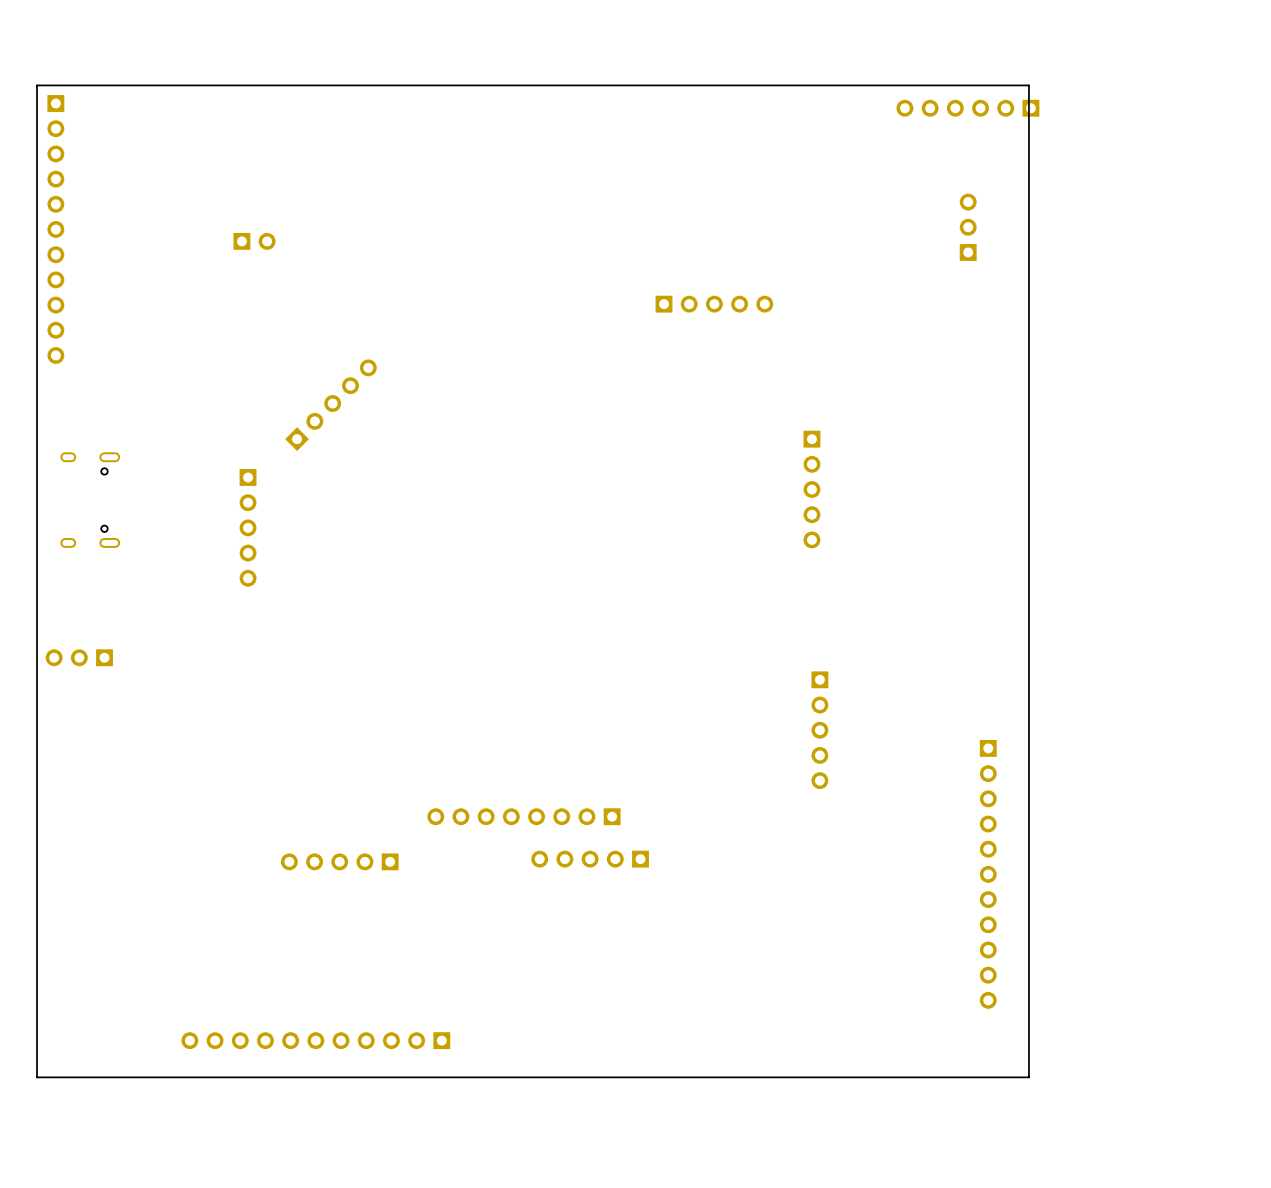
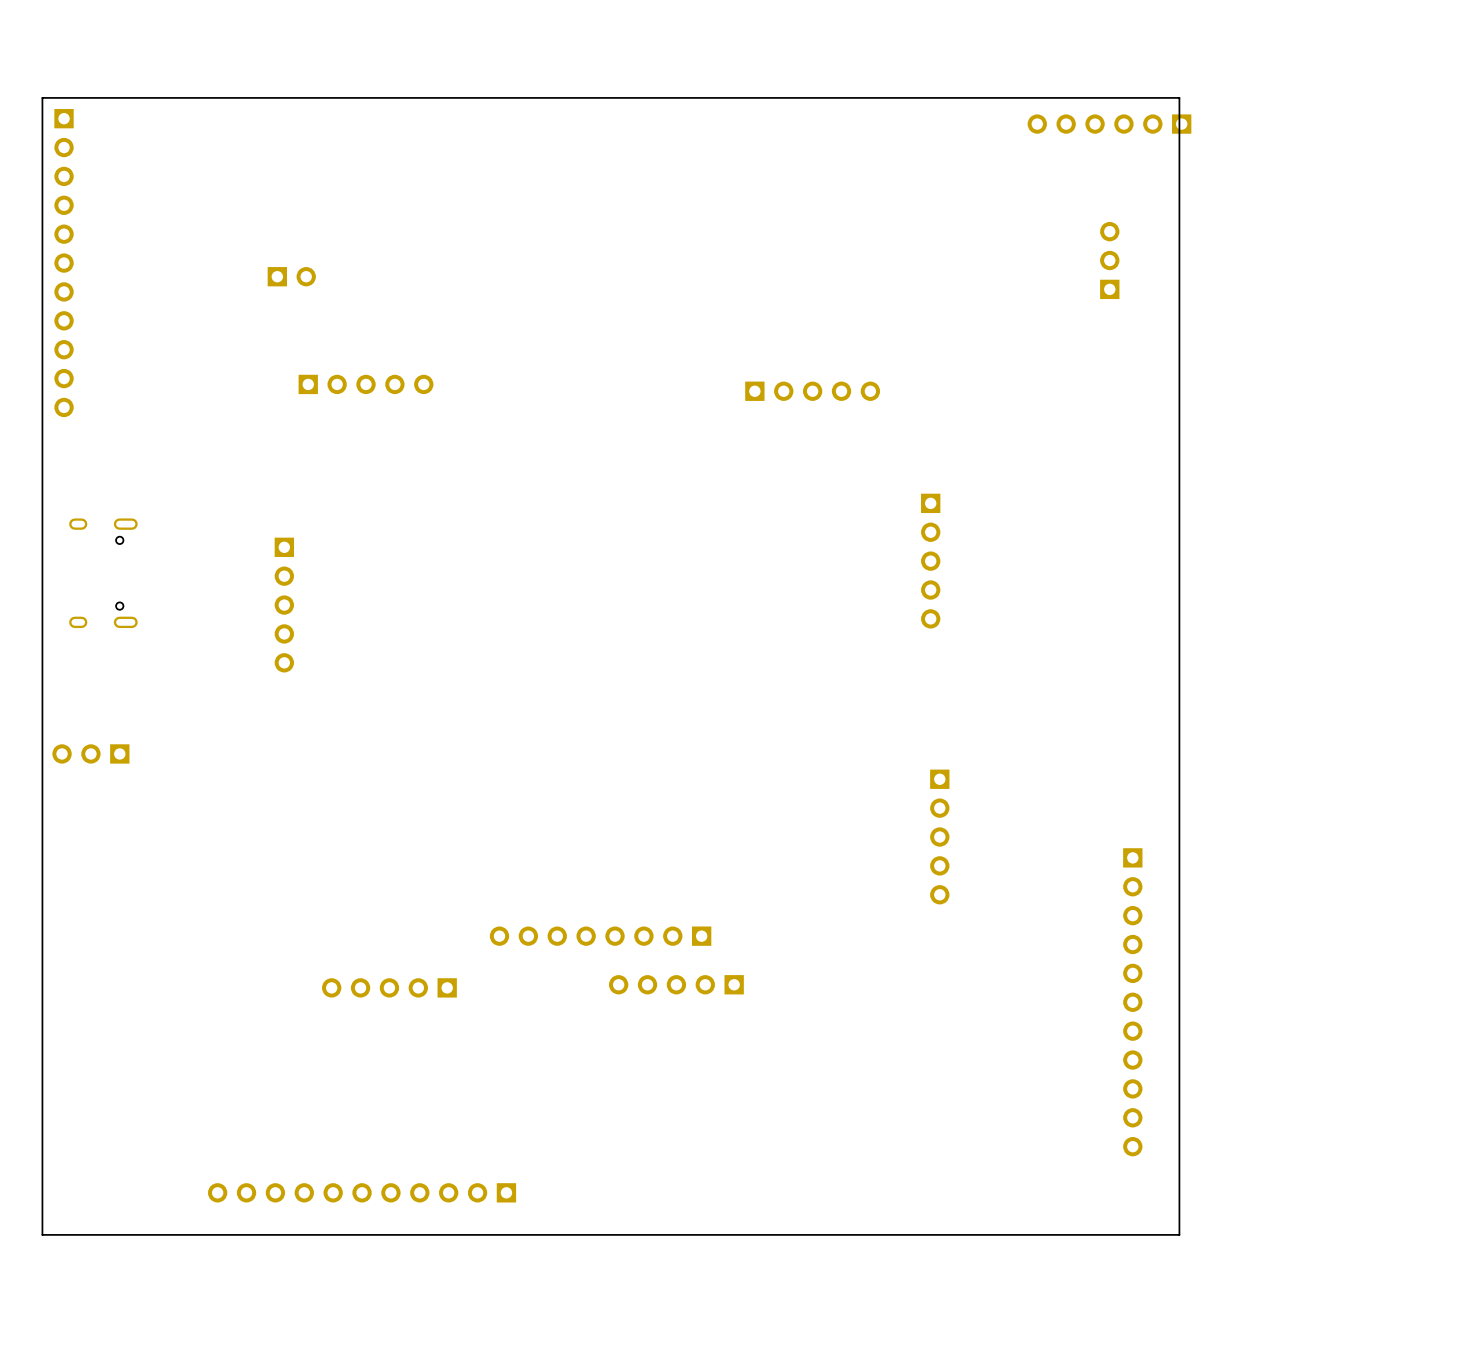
part position: (714, 304) -> (812, 391)
part: none -> (366, 384)
part: (330, 405) -> none

